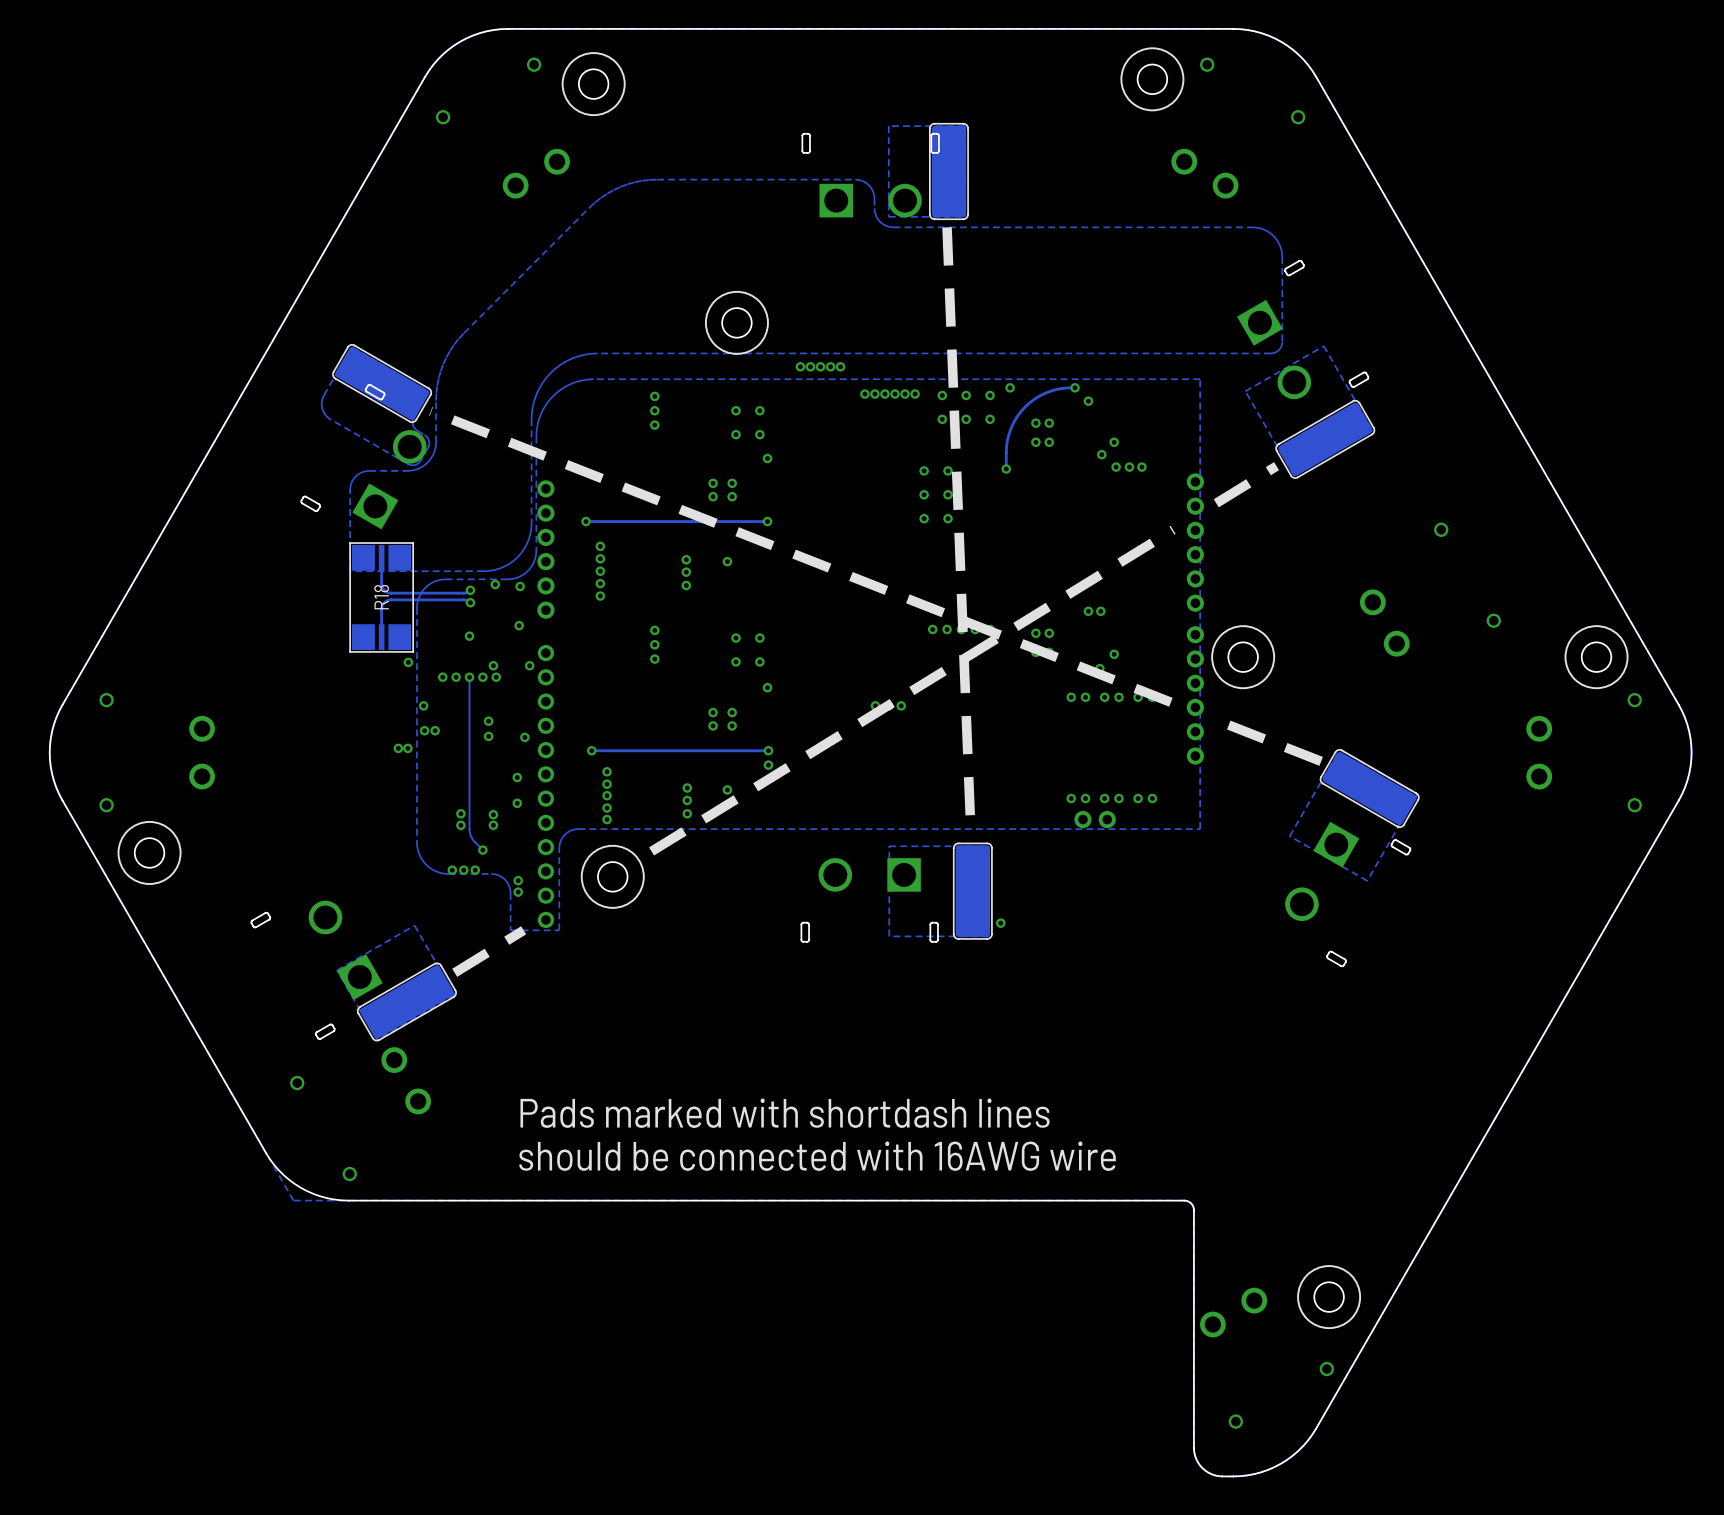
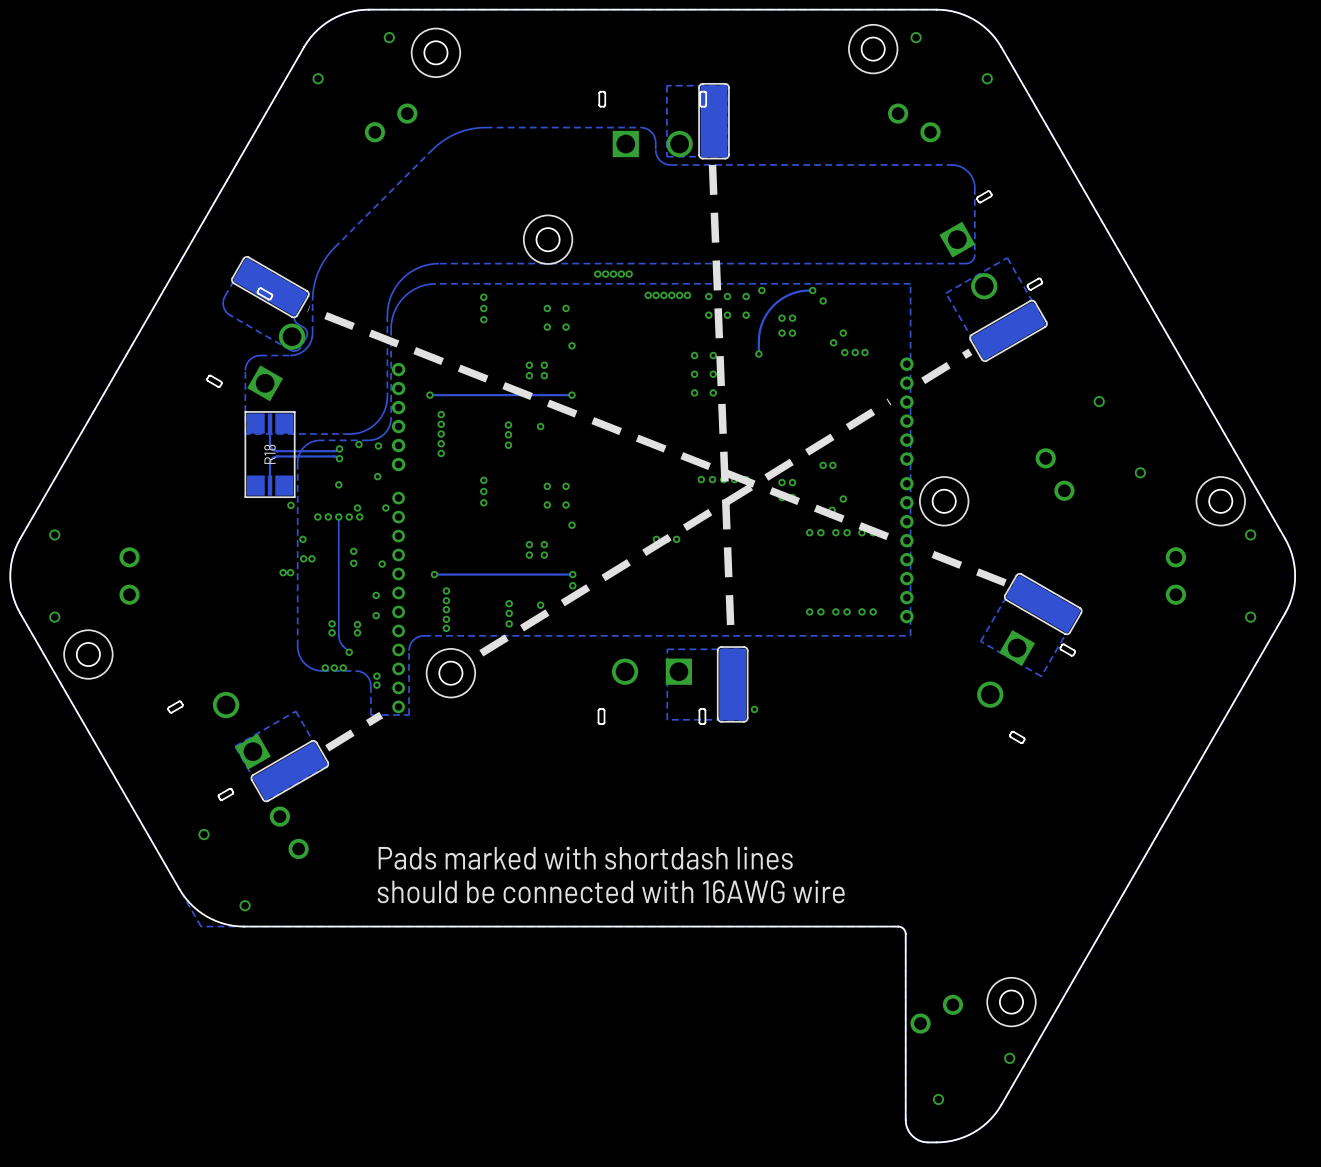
part: none -> (906, 550)
part: (1095, 819) -> none

